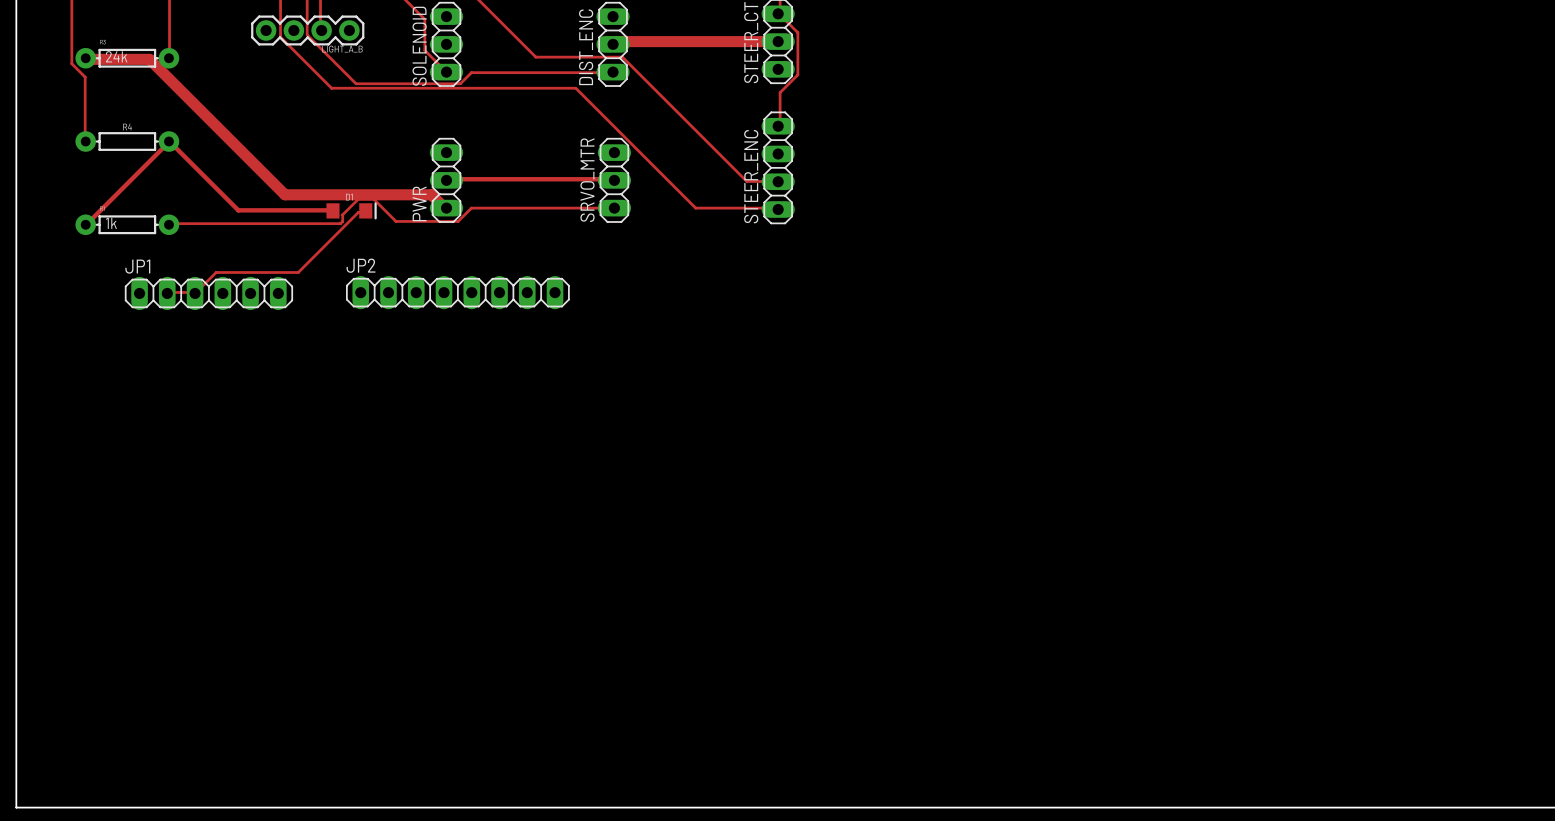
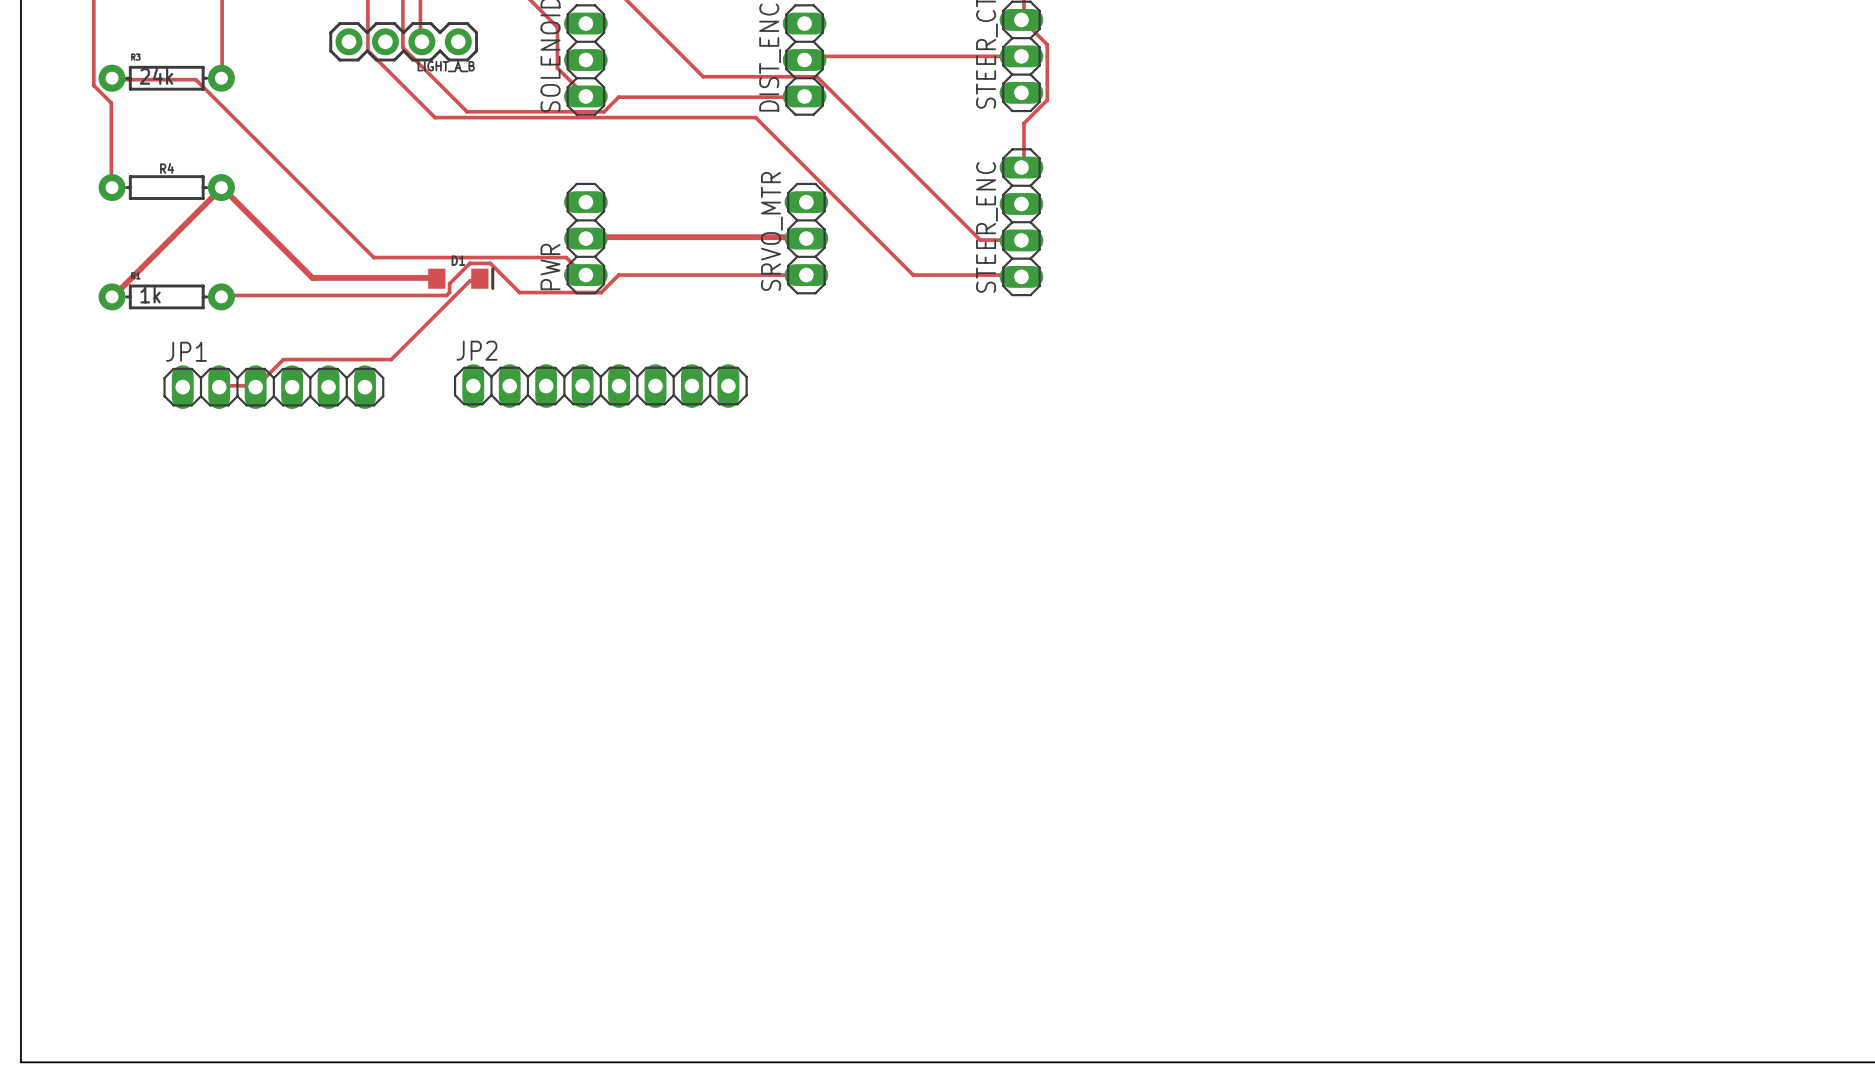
track width: thick (778, 41) (615, 41) (613, 44) -> thin (1021, 56) (808, 56) (804, 60)
track width: thick (85, 58) (149, 59) (284, 194) (431, 194) (444, 208) -> thin (112, 78) (195, 79) (373, 257) (566, 257) (583, 275)

